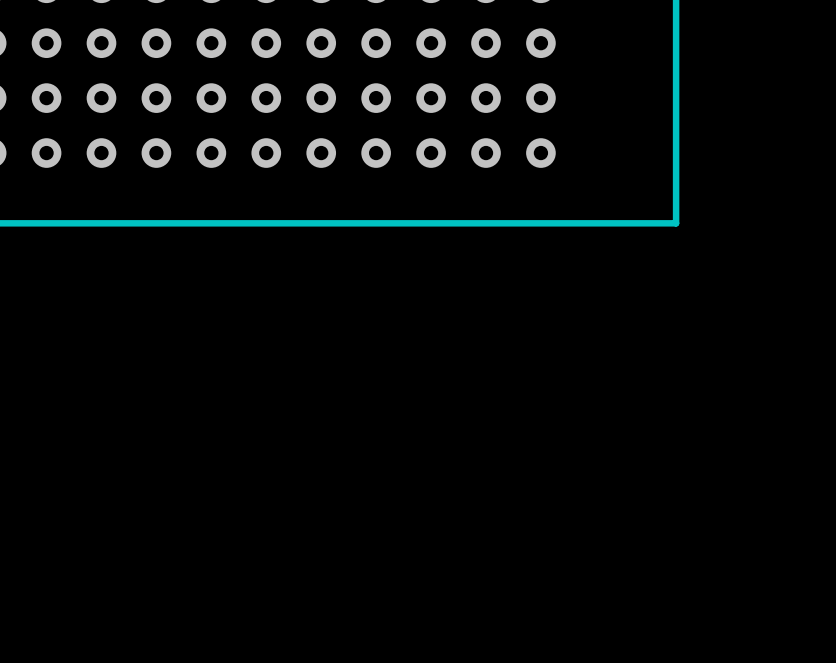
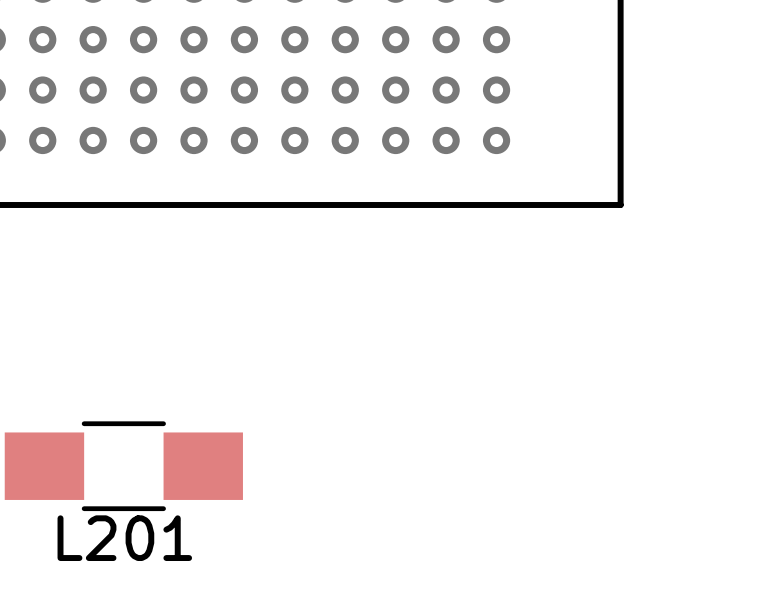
L201: none -> (123, 466)

